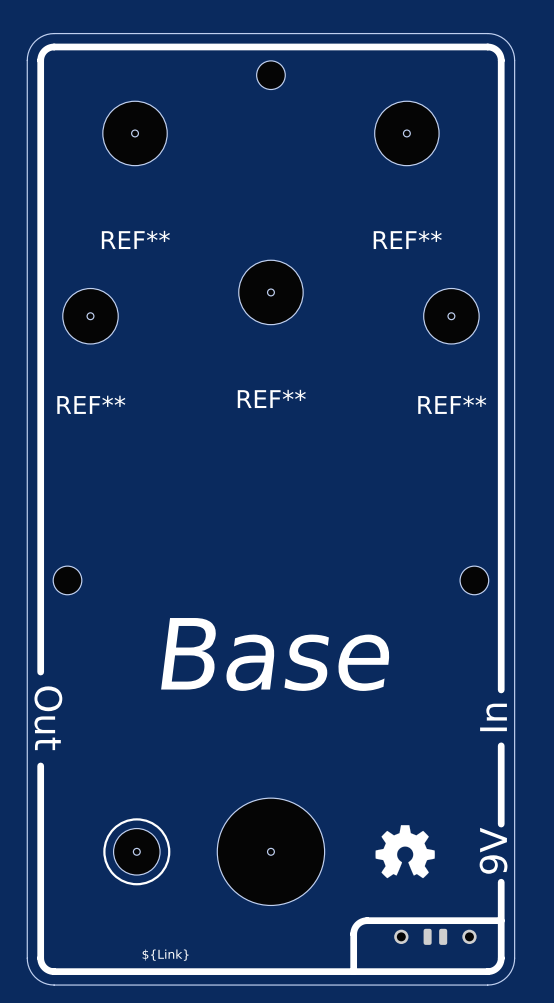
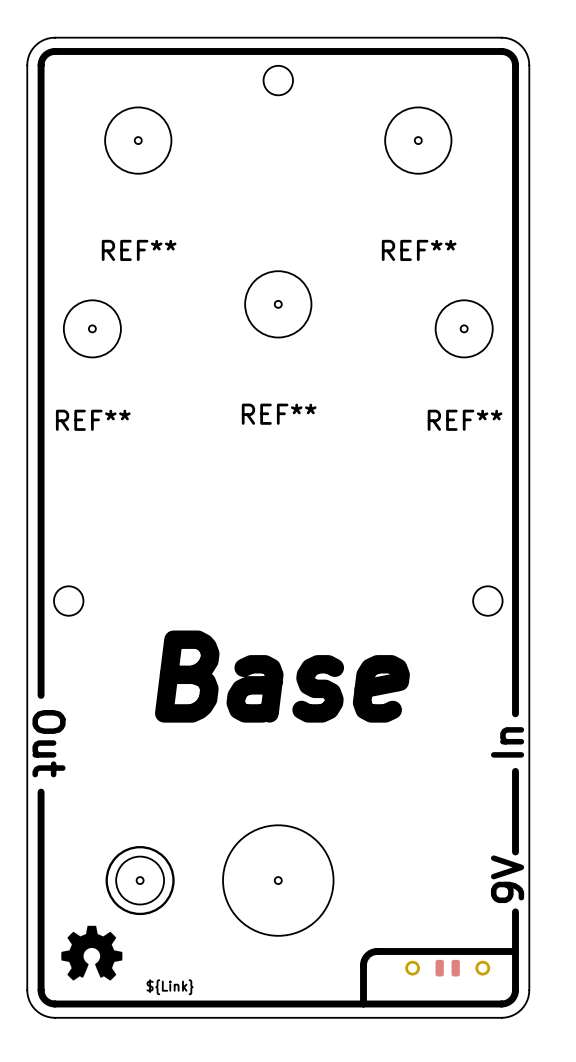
drawing: [375, 825, 435, 879] -> none
drawing: none -> [61, 925, 123, 981]

